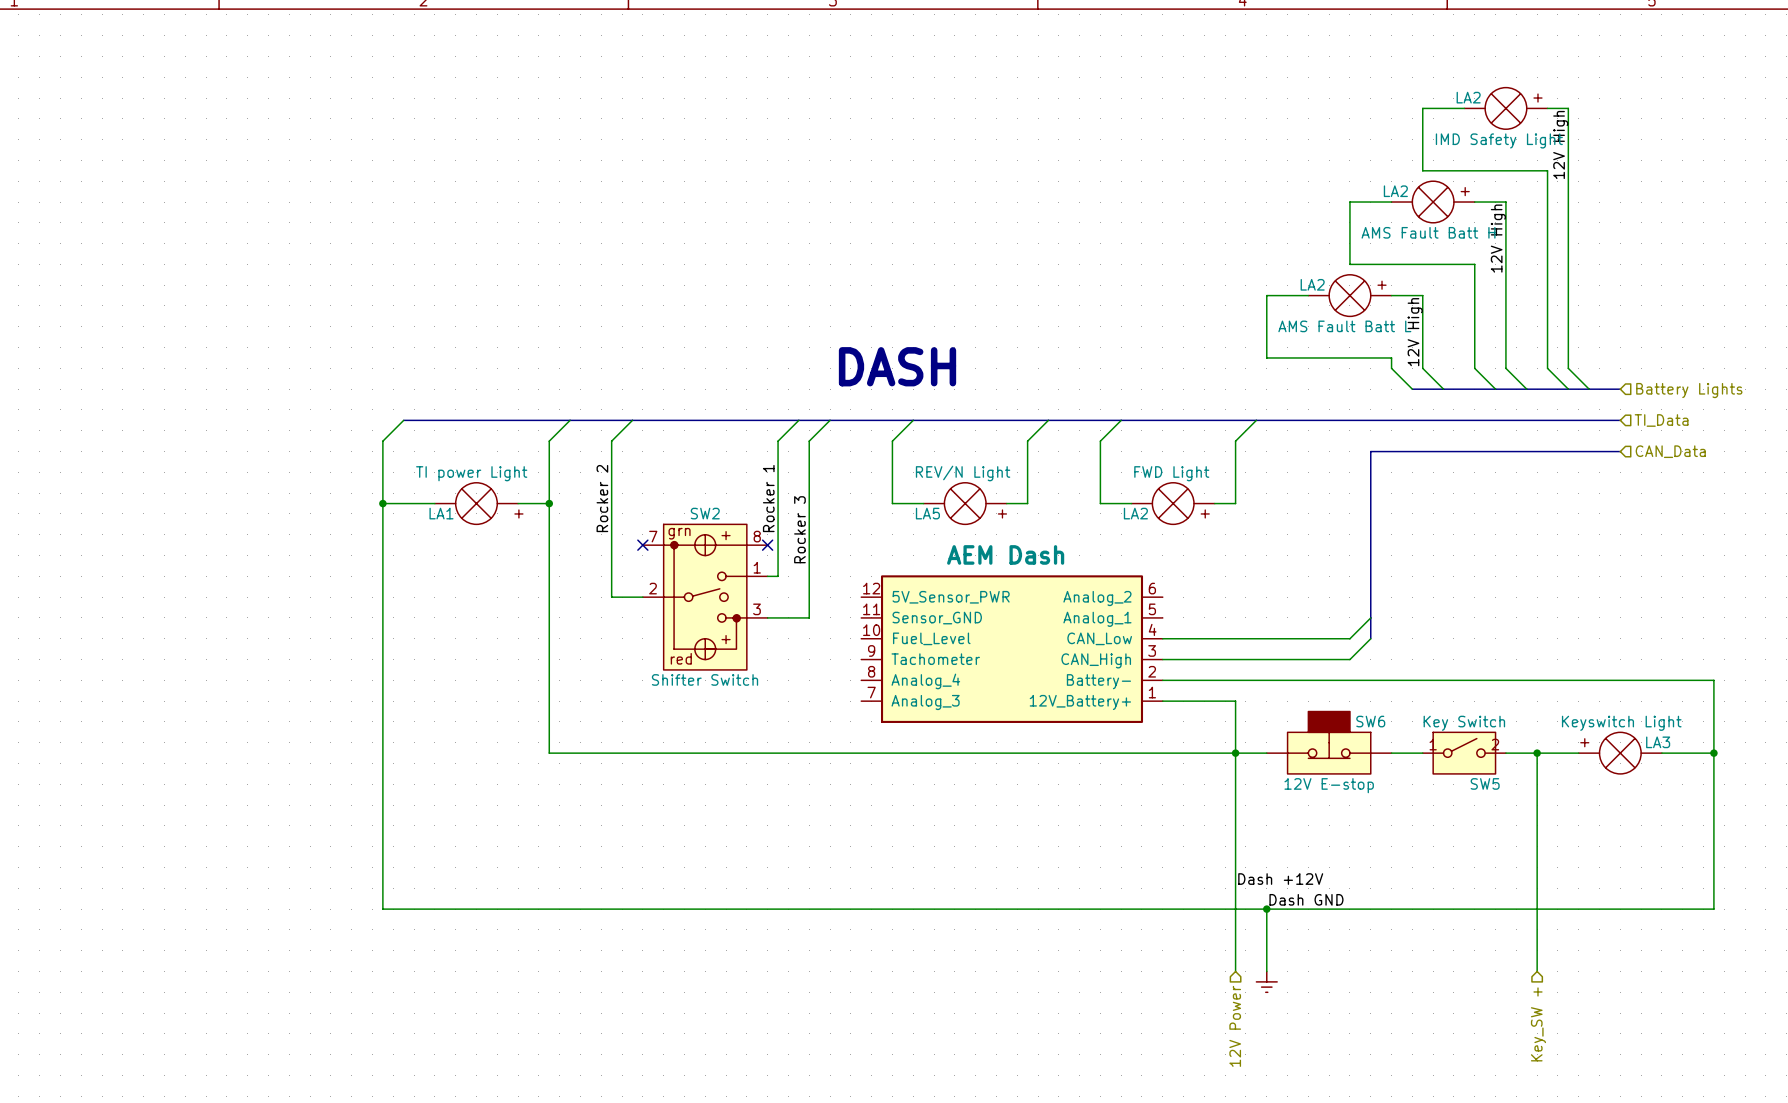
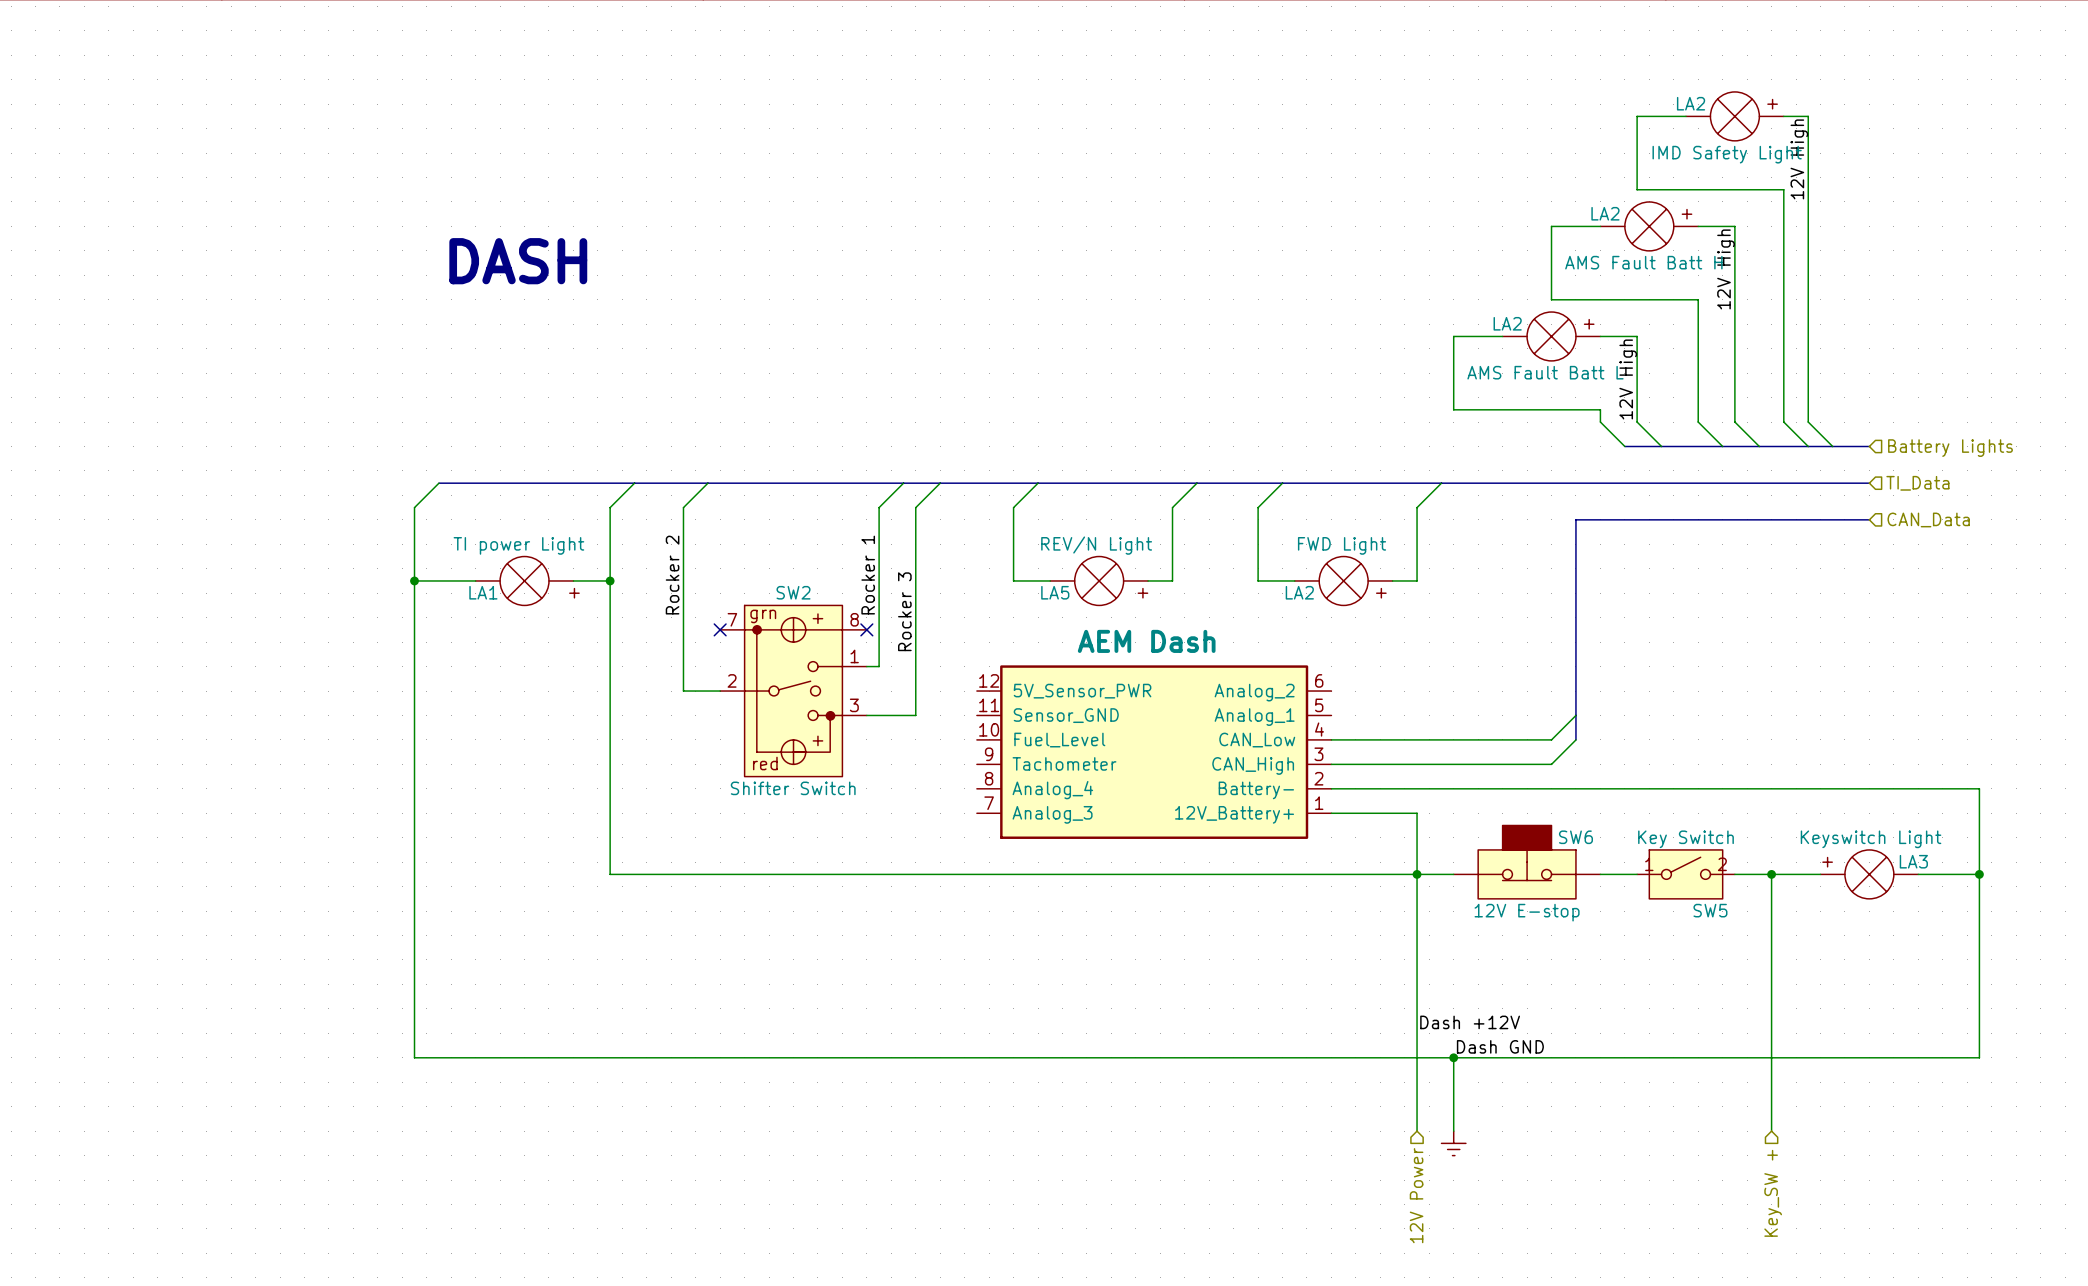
text: none -> DASH (518, 261)
text: DASH (897, 366) -> none

